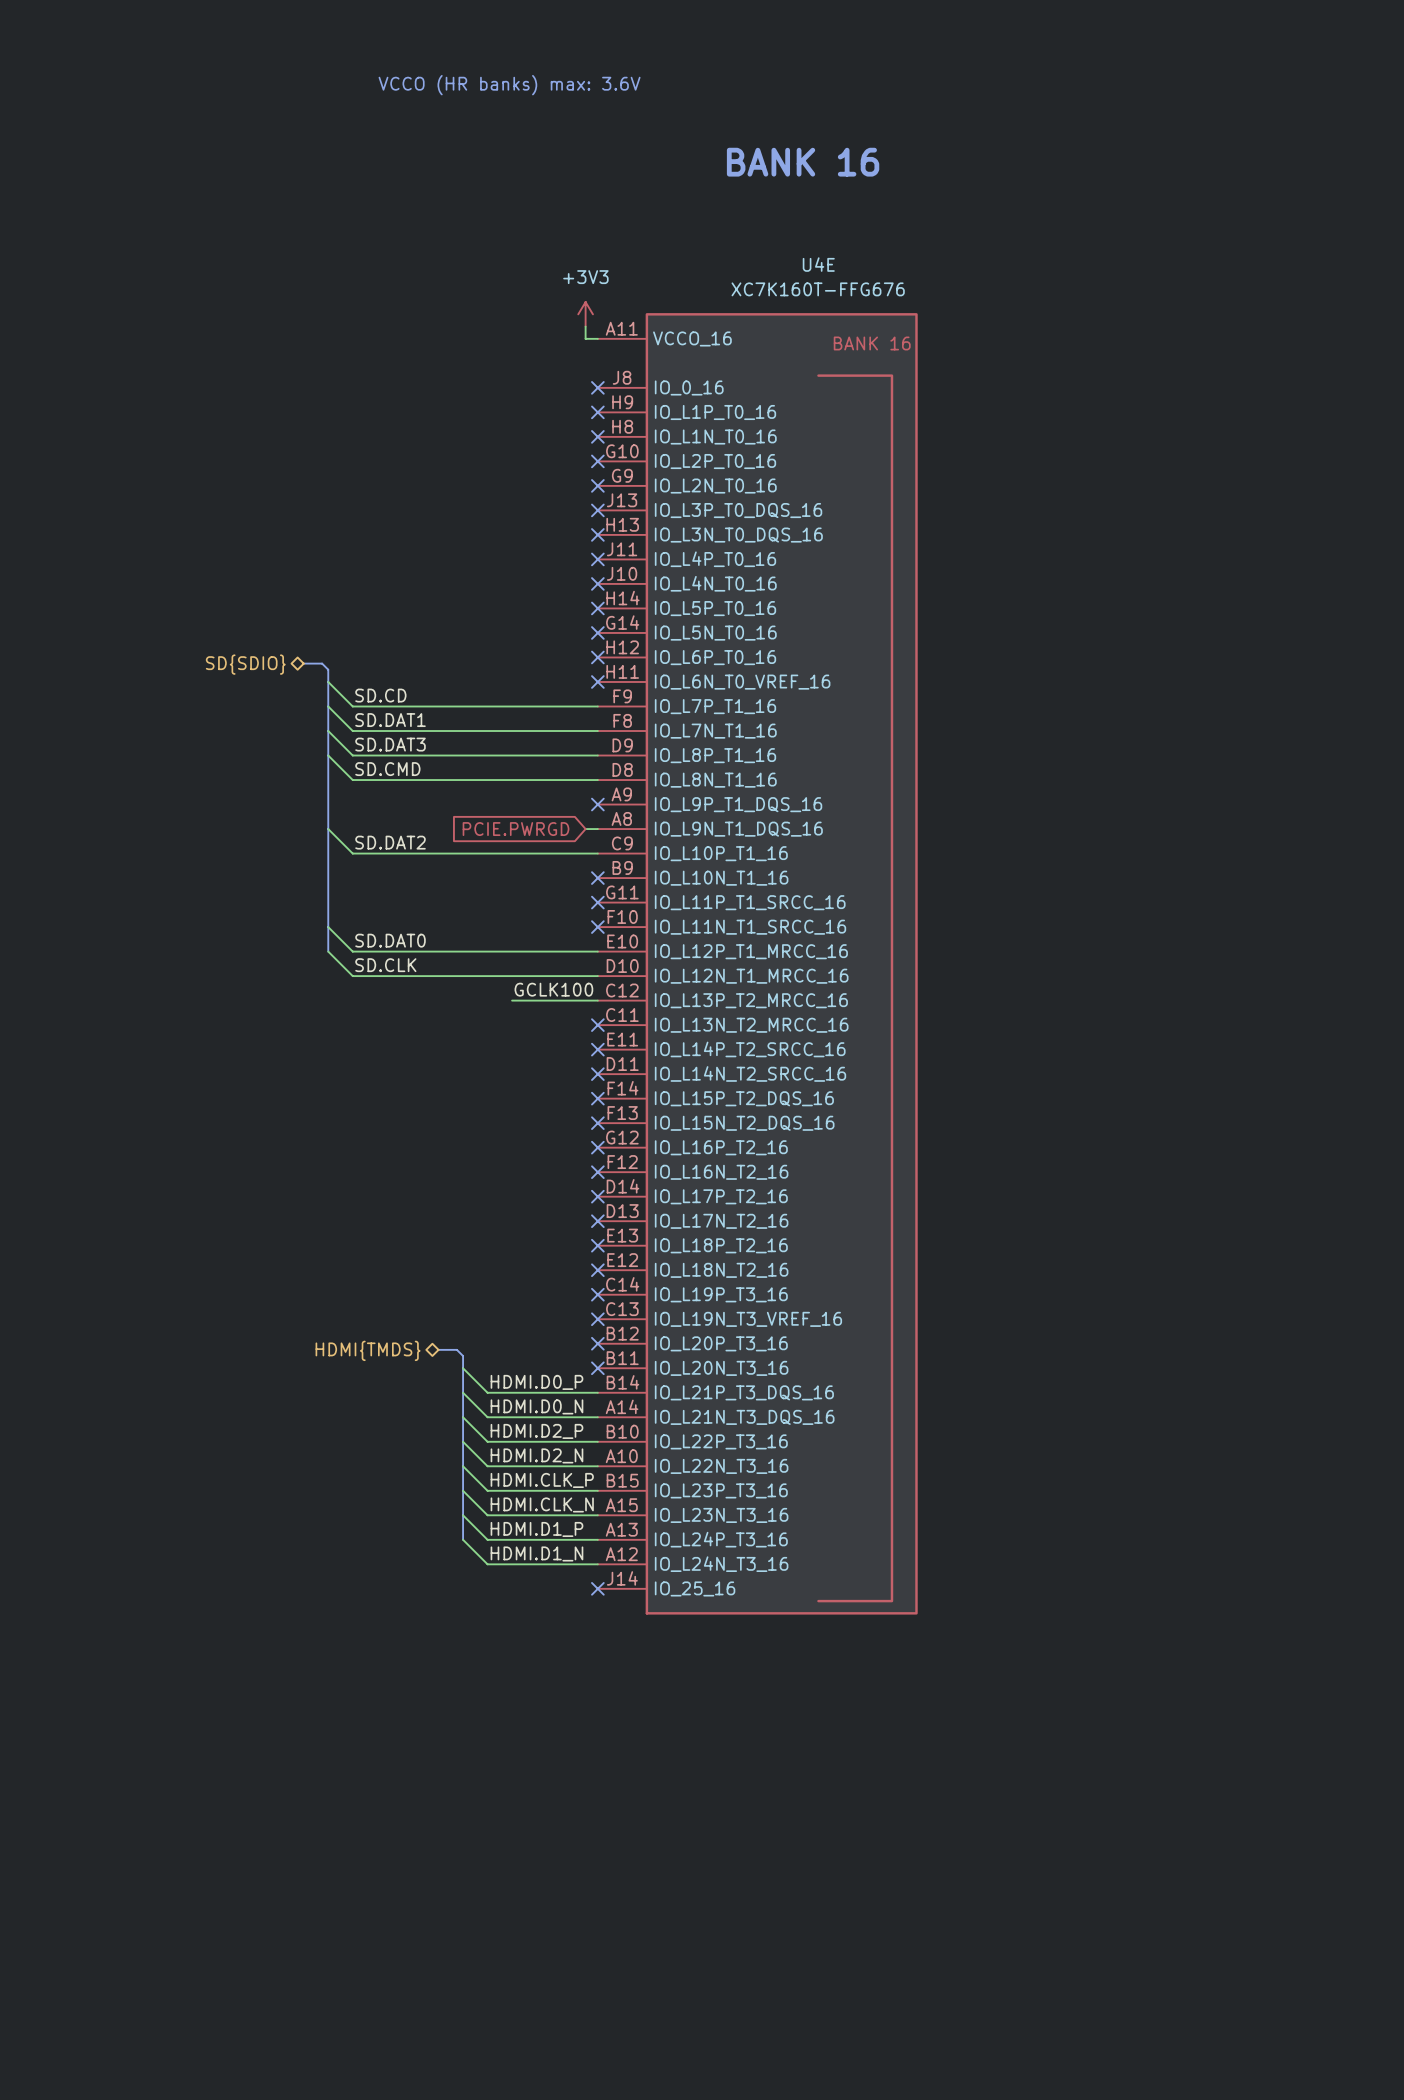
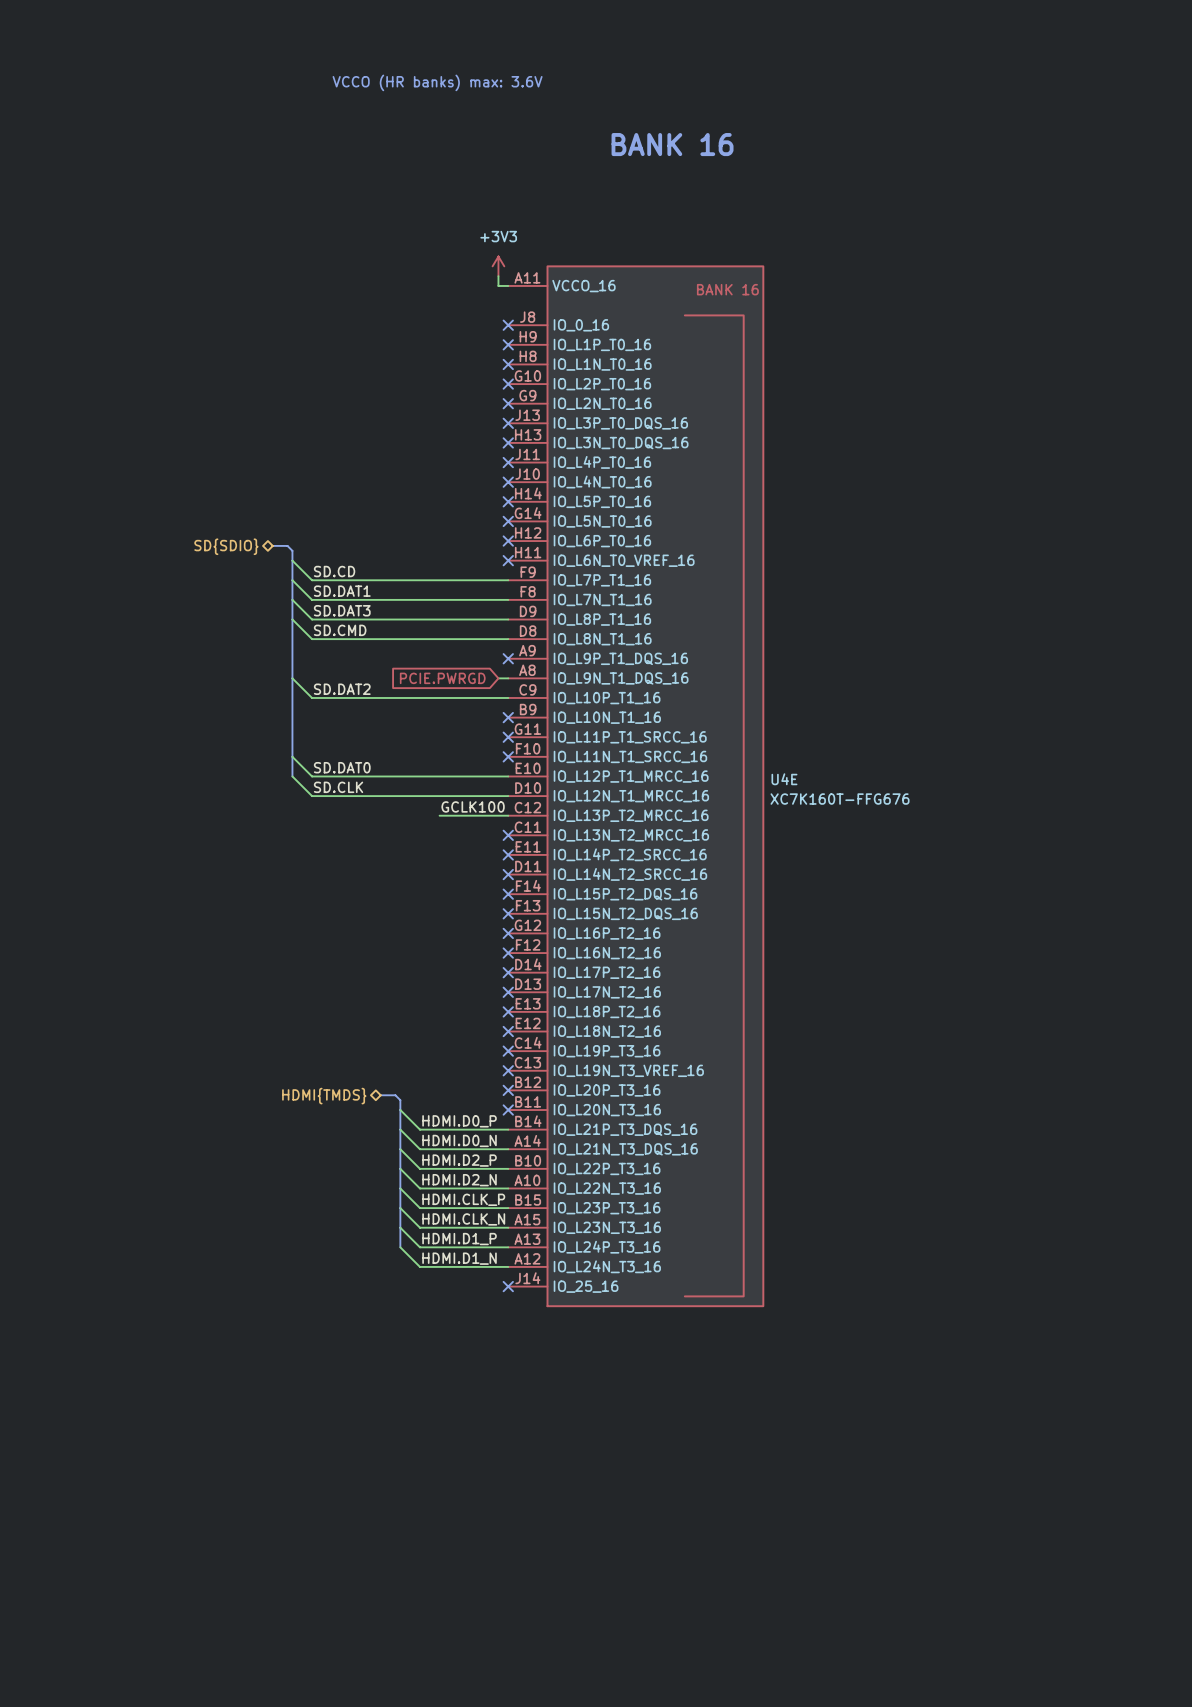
U4E name position: U4E (818, 264) -> U4E (784, 779)
U4E value position: XC7K160T-FFG676 (818, 289) -> XC7K160T-FFG676 (840, 799)

